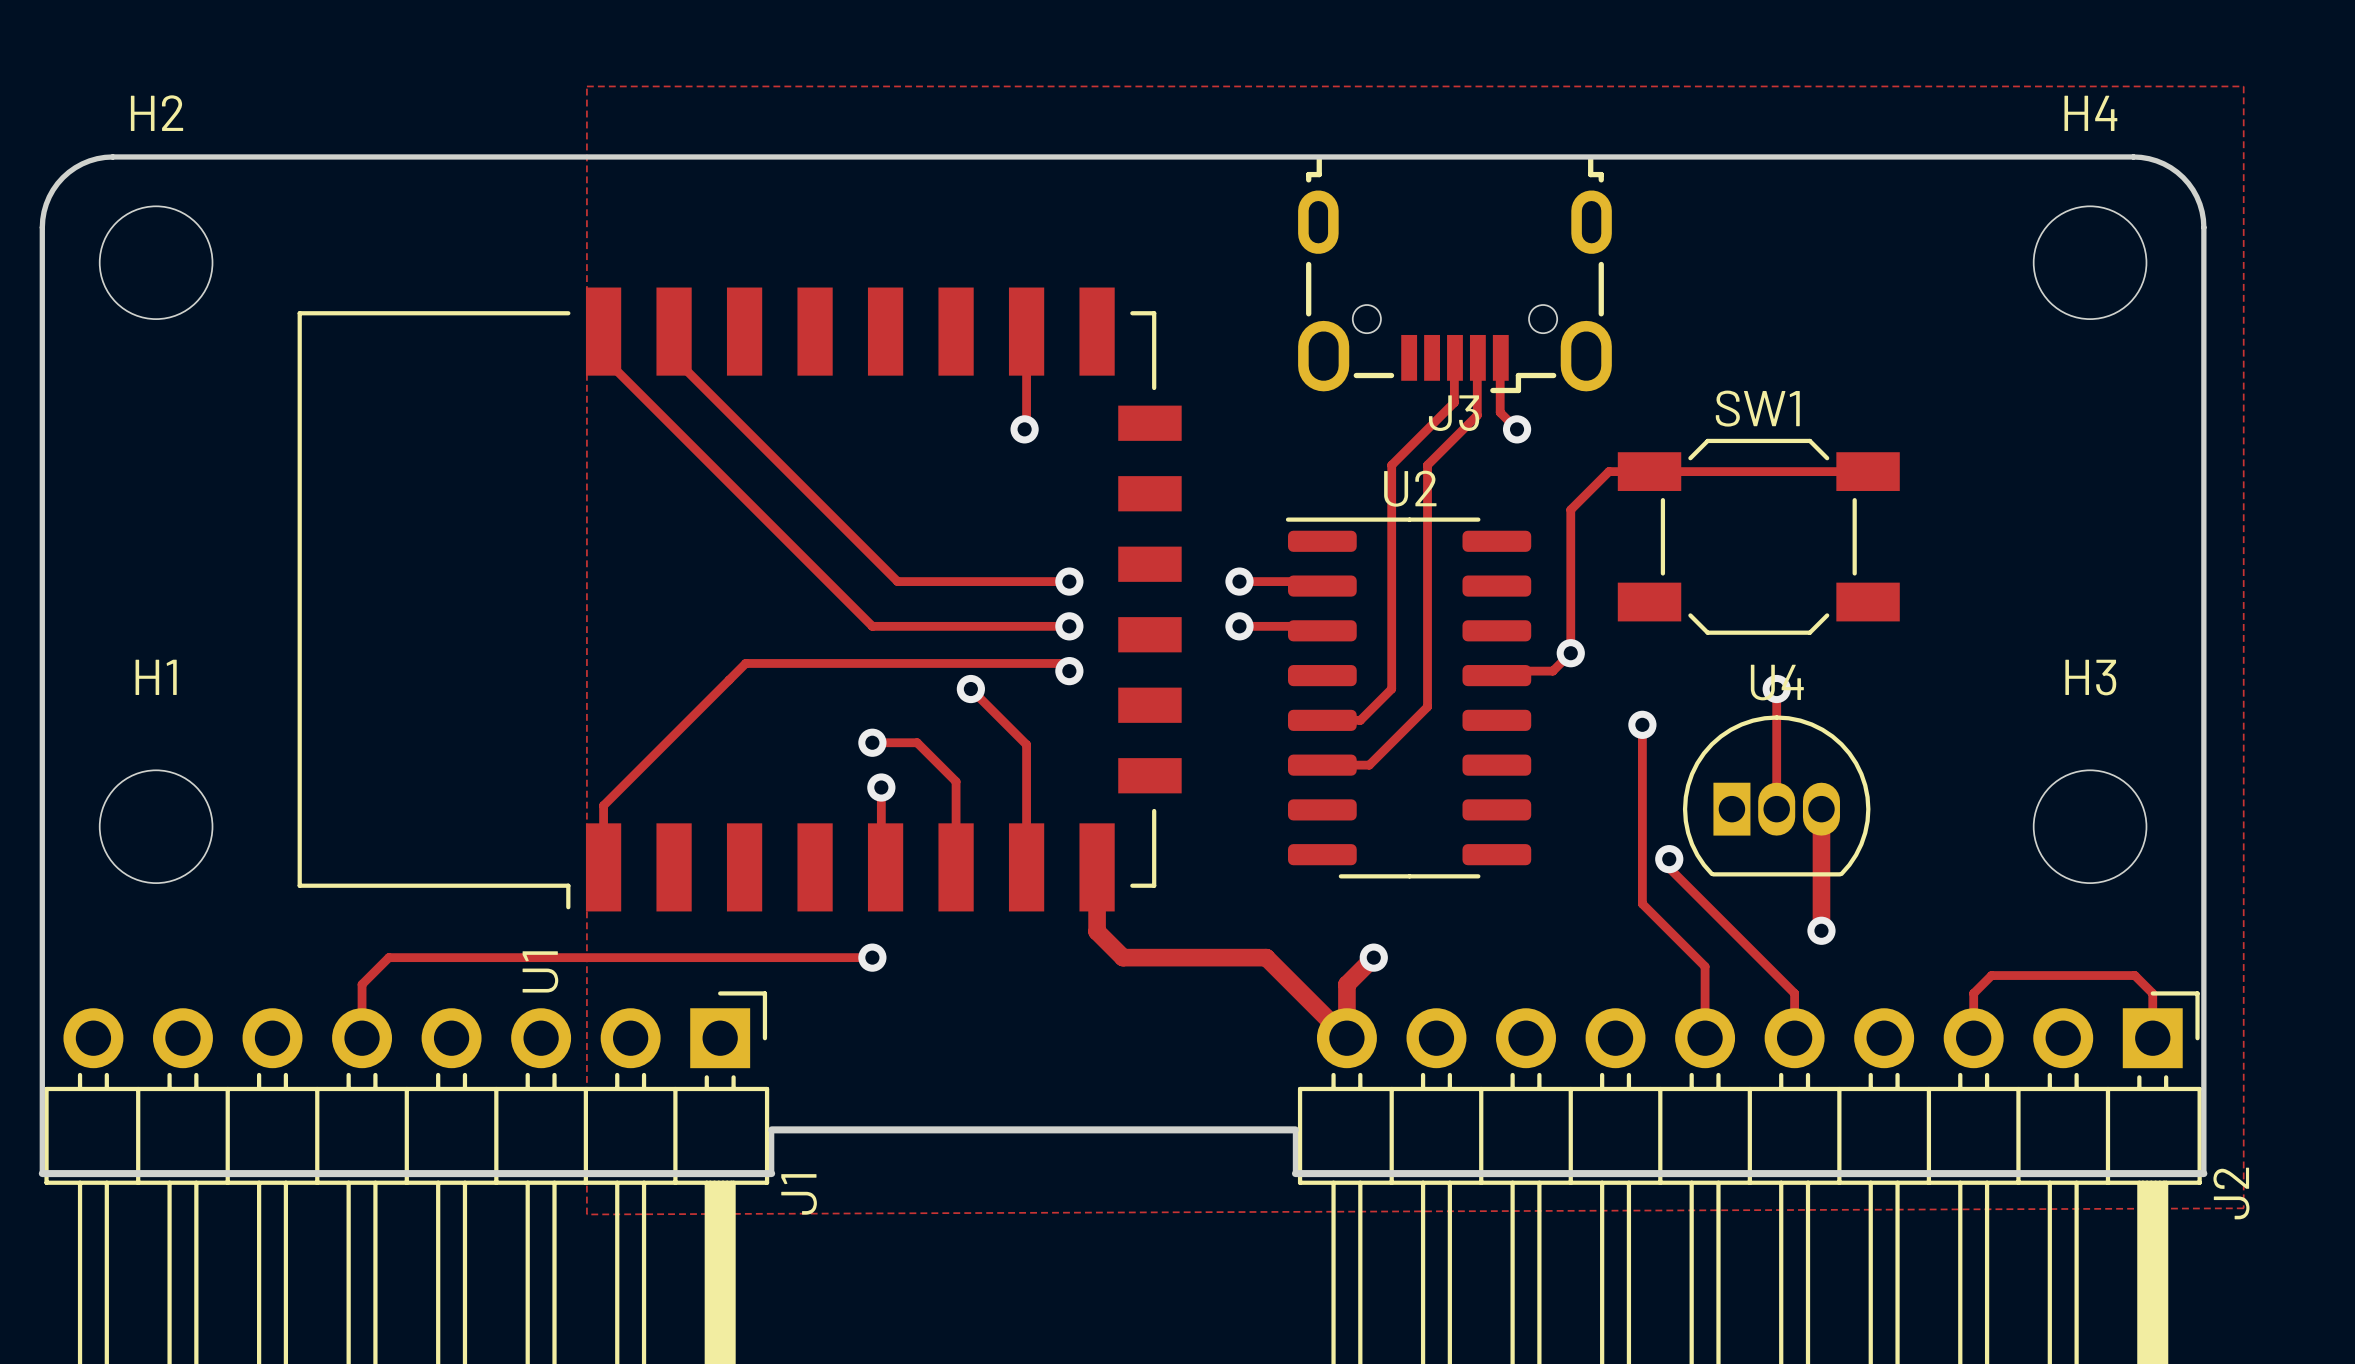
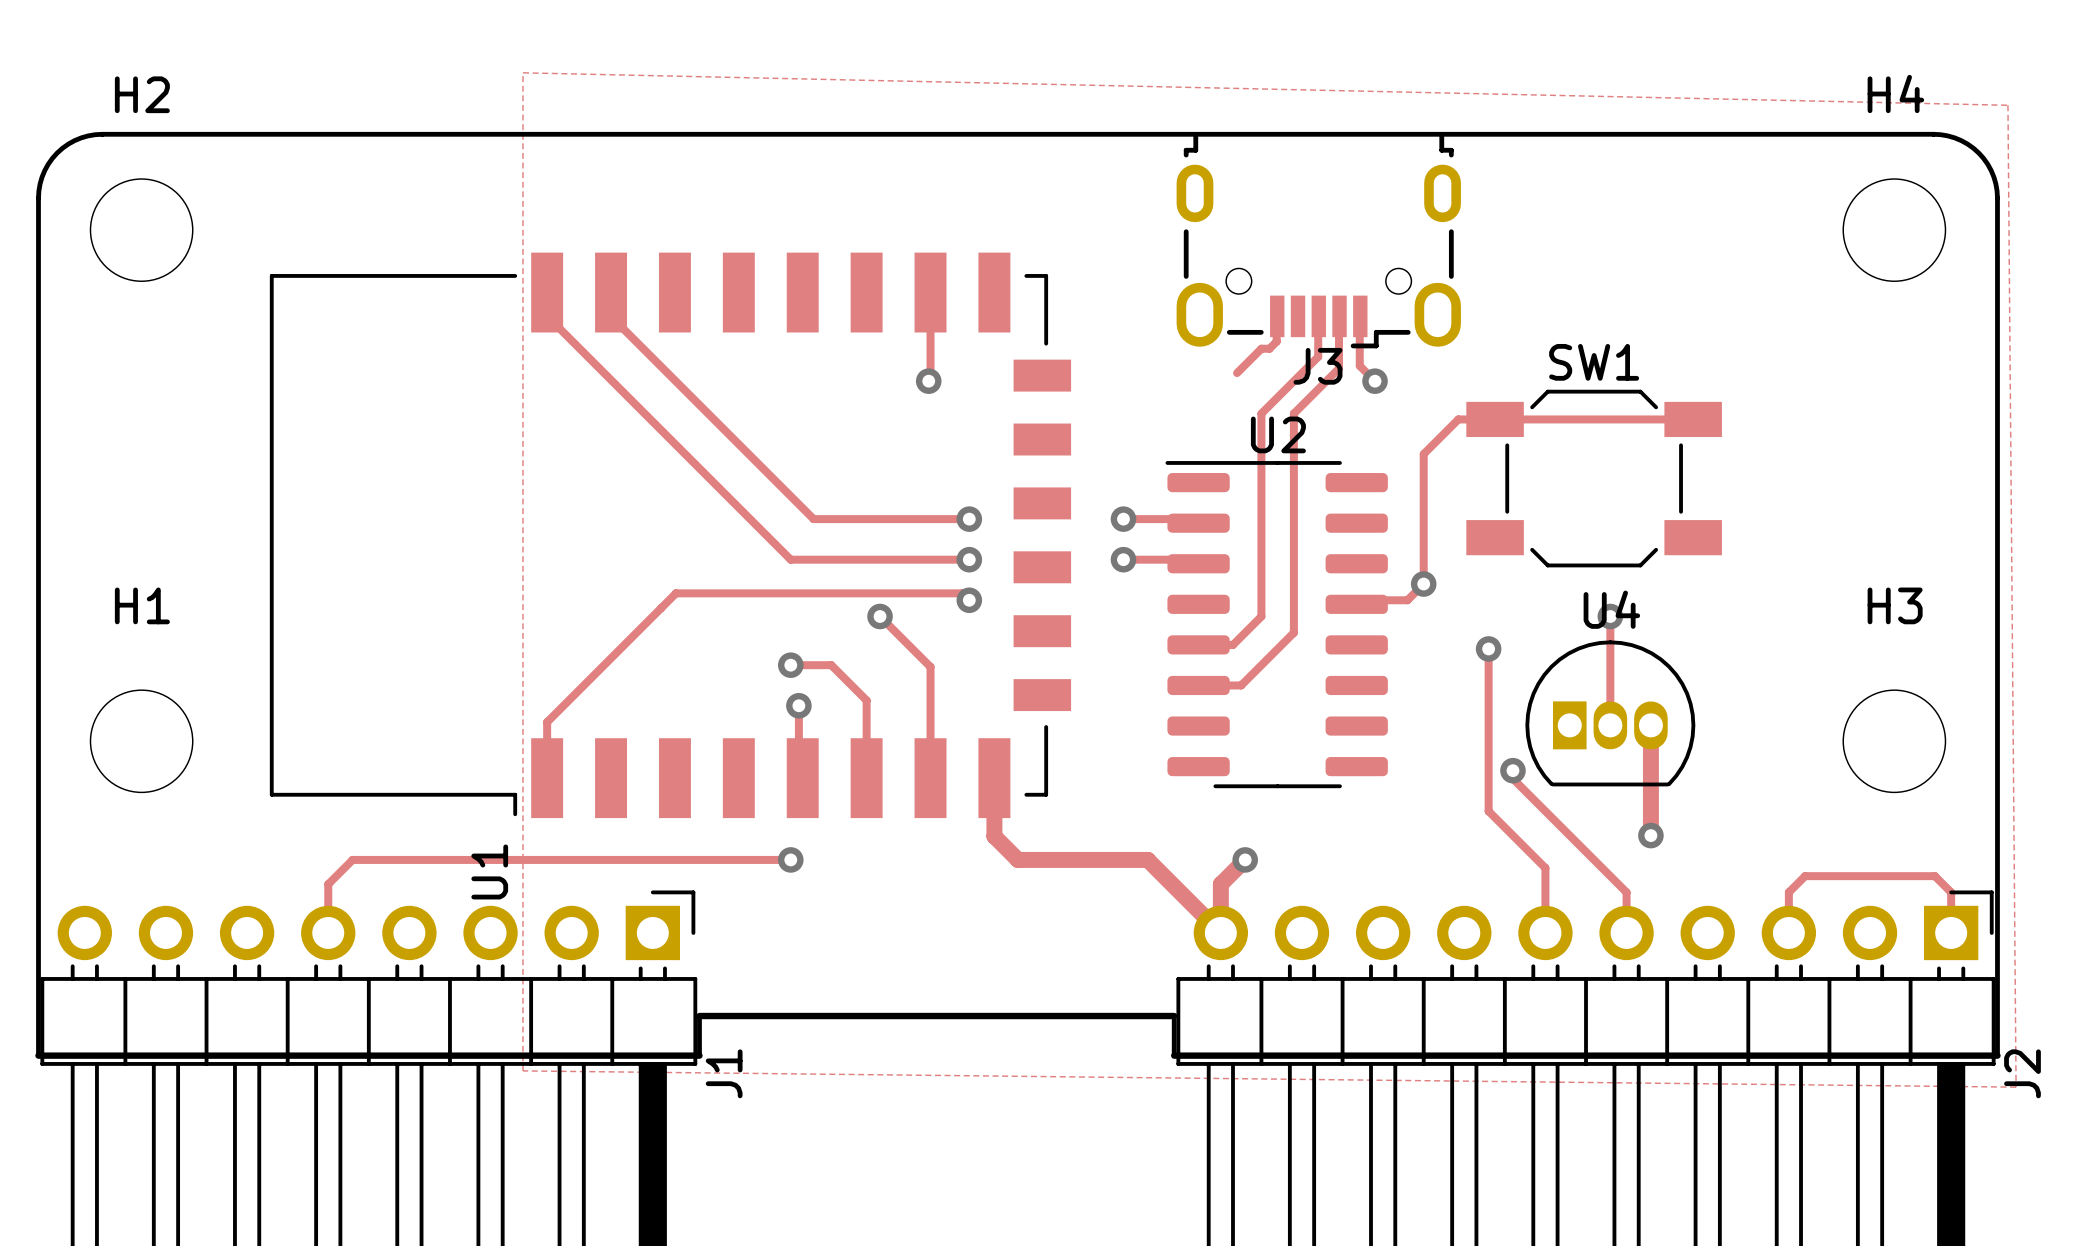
zone outline: (586, 86) (586, 1214) (2243, 1208) (2243, 86) (586, 86) -> (523, 72) (523, 1070) (2016, 1087) (2007, 105) (523, 72)
track: none -> (1276, 312) (1276, 341) (1269, 348) (1261, 348) (1237, 373)

